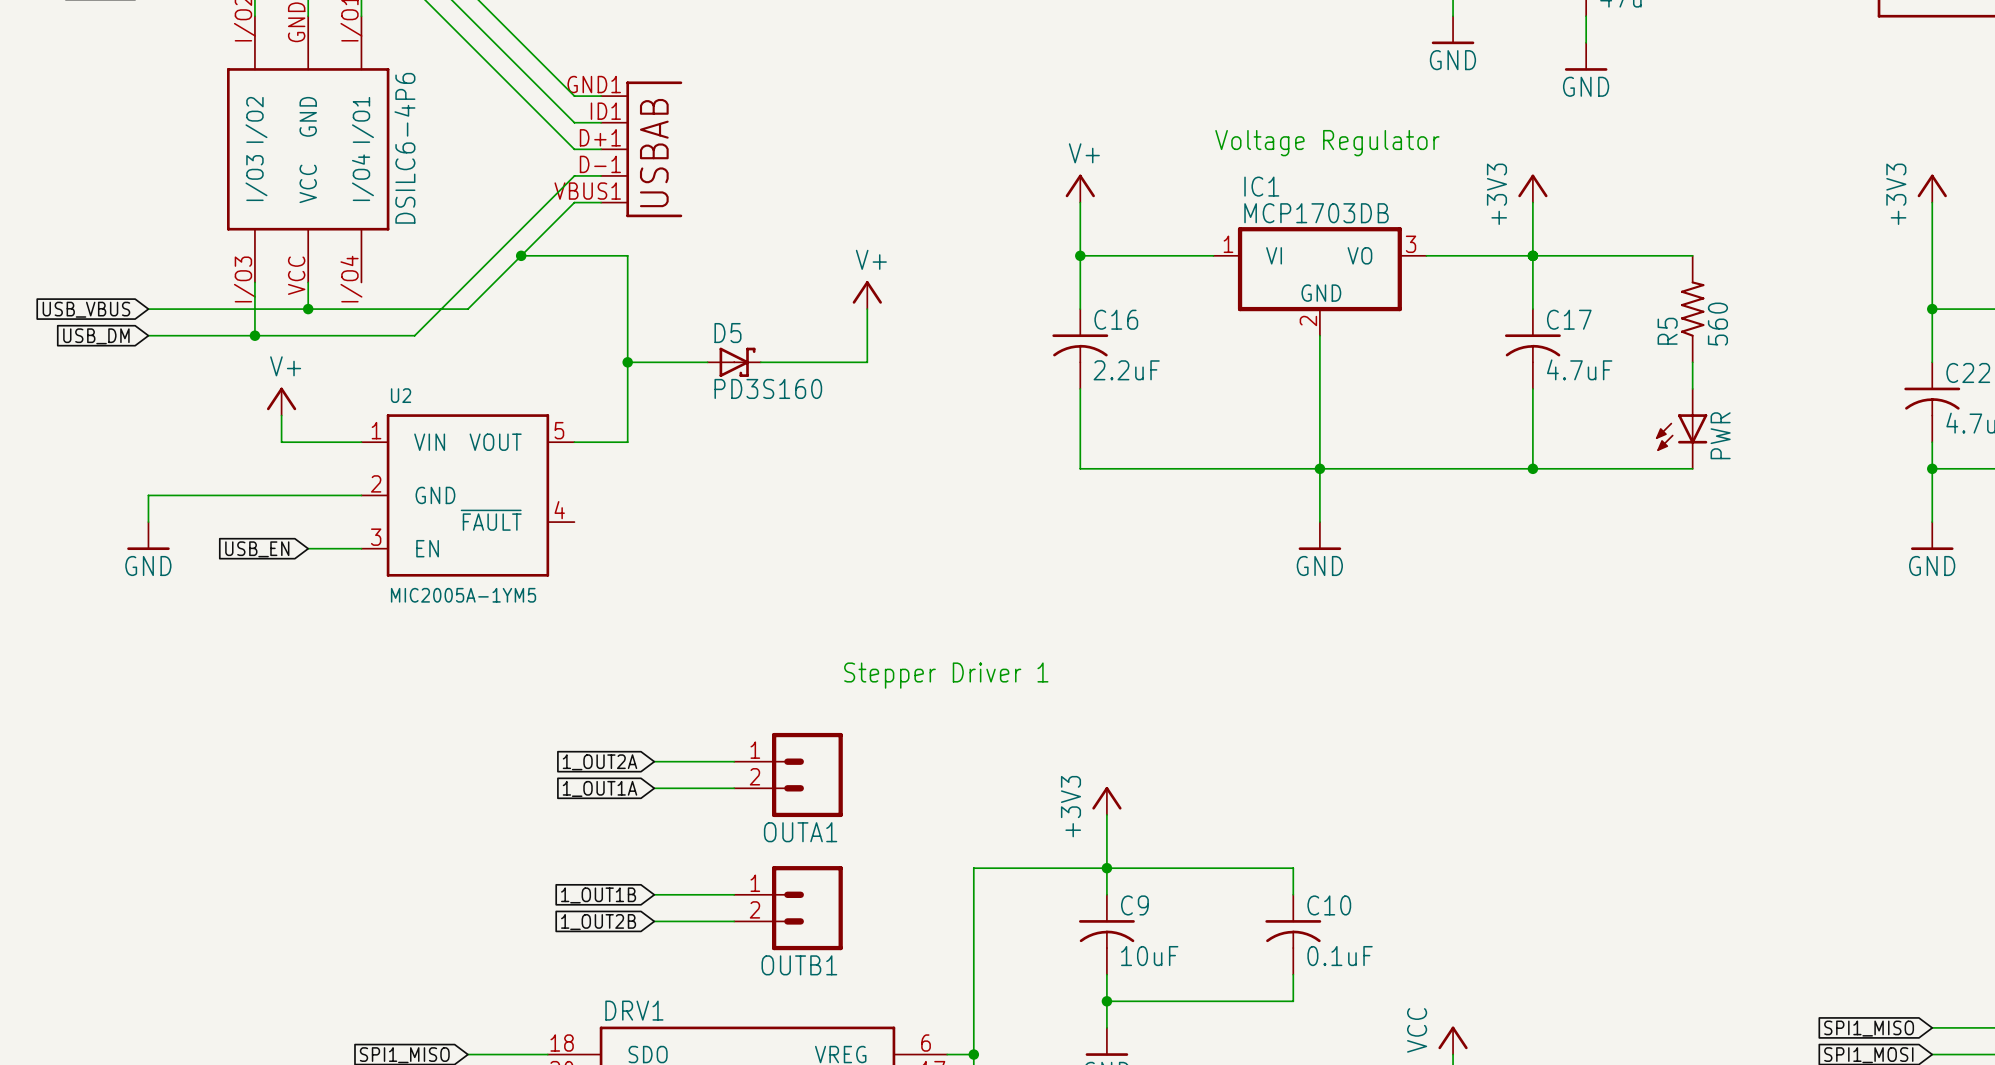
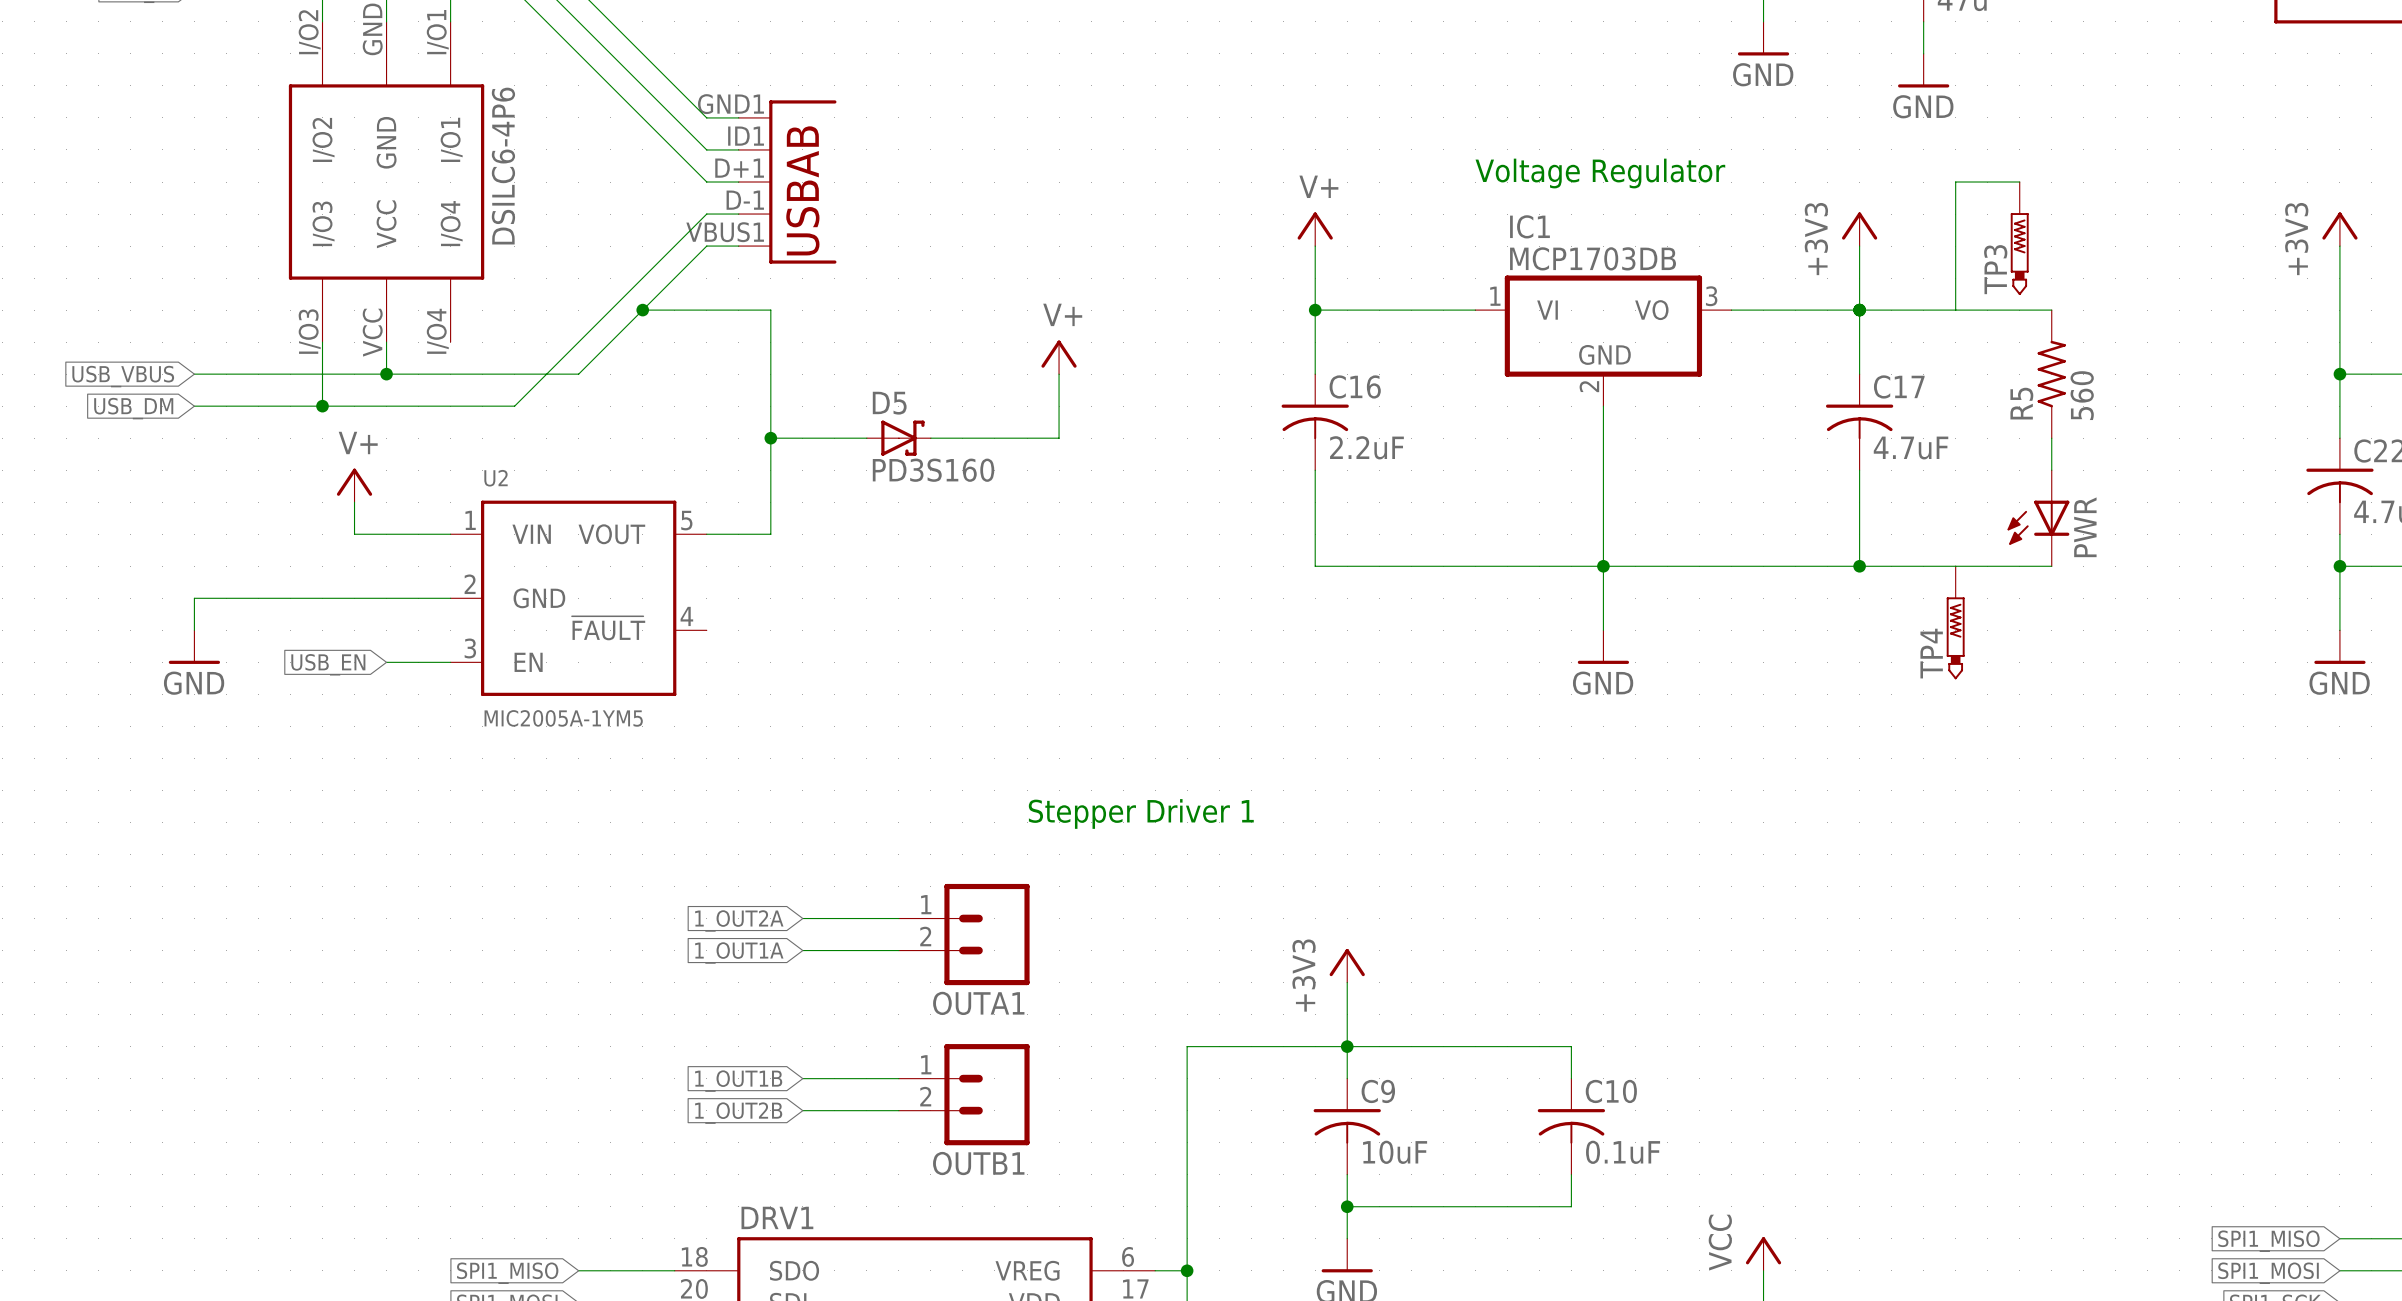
wire: none -> (2019, 182) (1955, 182) (1955, 310)
TP3: none -> (2019, 238)
TP4: none -> (1955, 622)

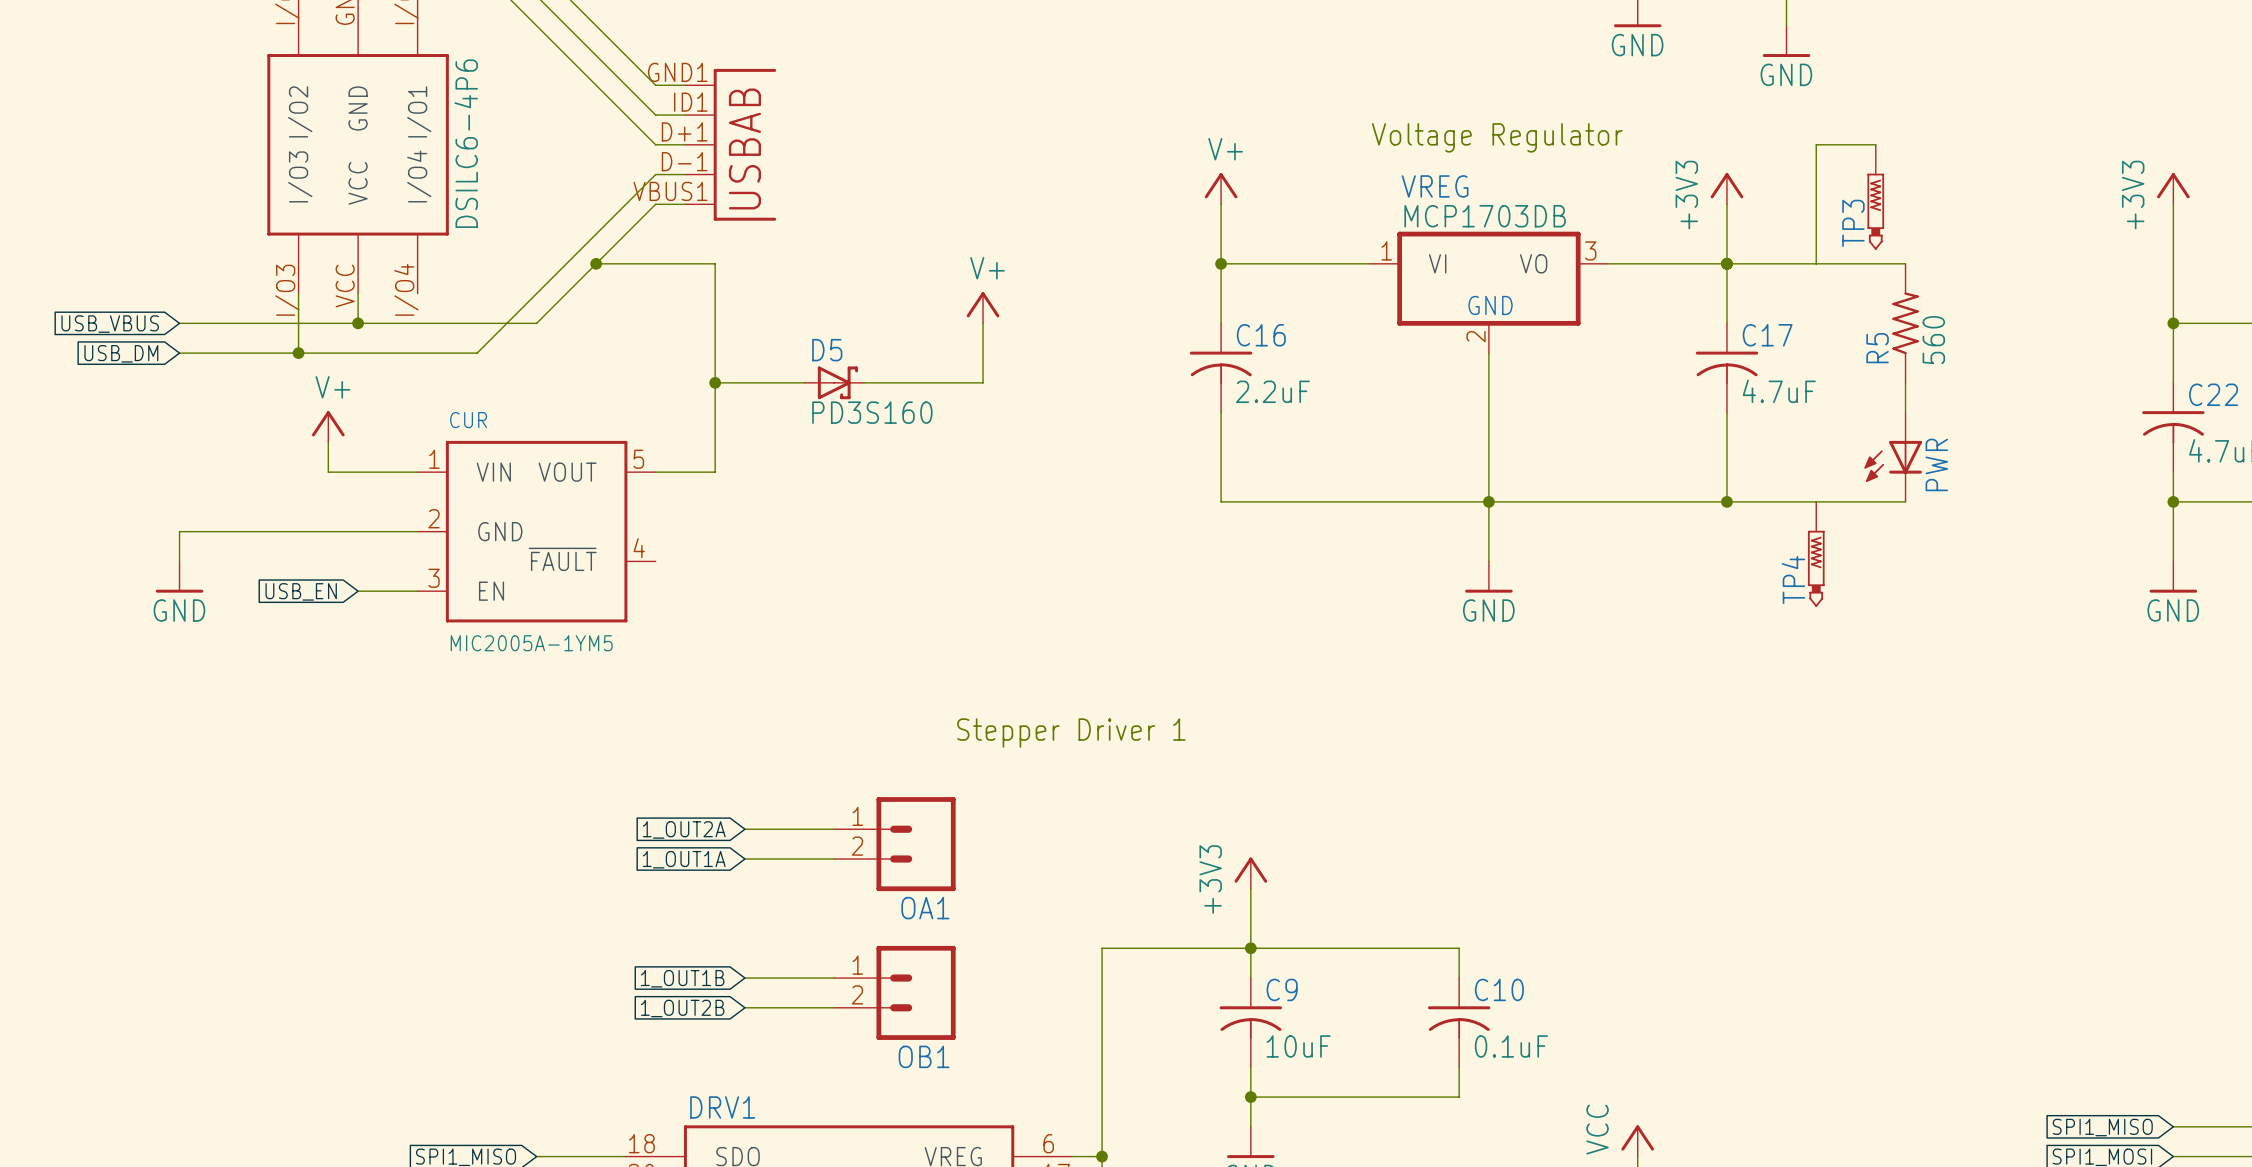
IC1 name: IC1 (1529, 226) -> VREG (1435, 186)
U2 name: U2 (496, 478) -> CUR (468, 420)
OUTA1 name: OUTA1 (978, 1003) -> OA1 (925, 908)
OUTB1 name: OUTB1 (978, 1163) -> OB1 (924, 1056)

